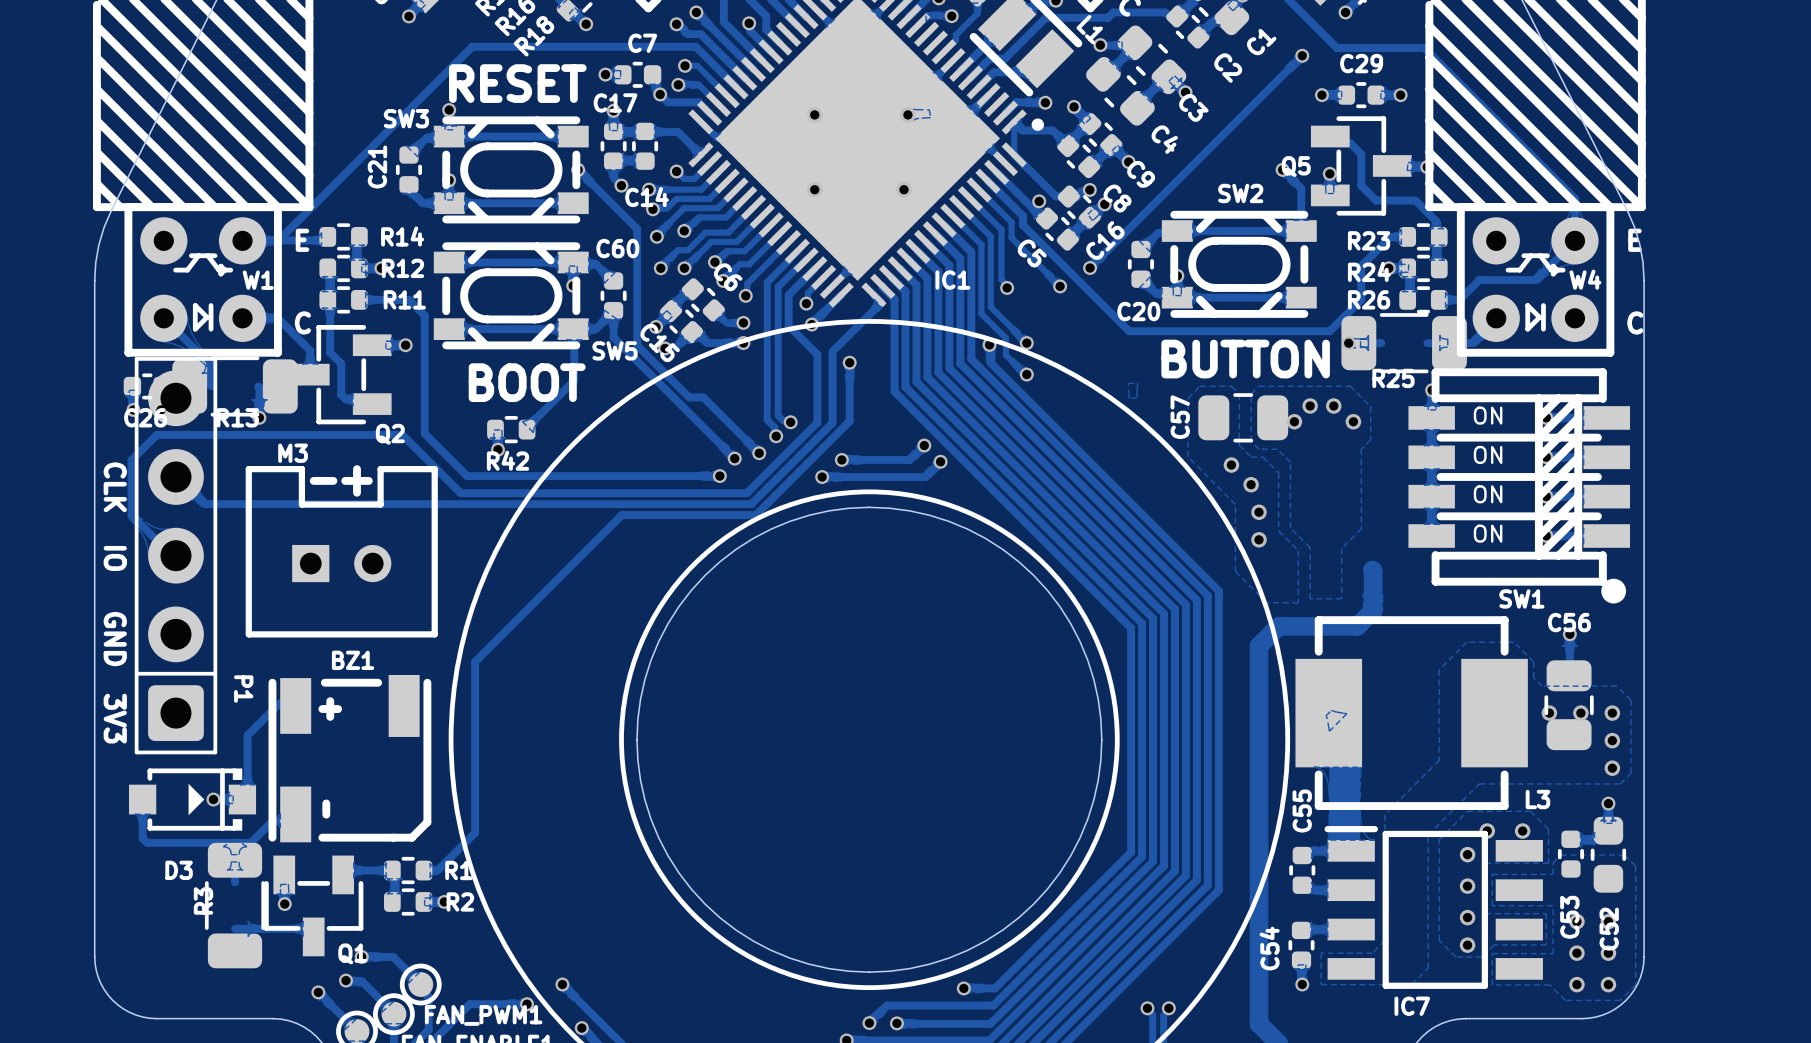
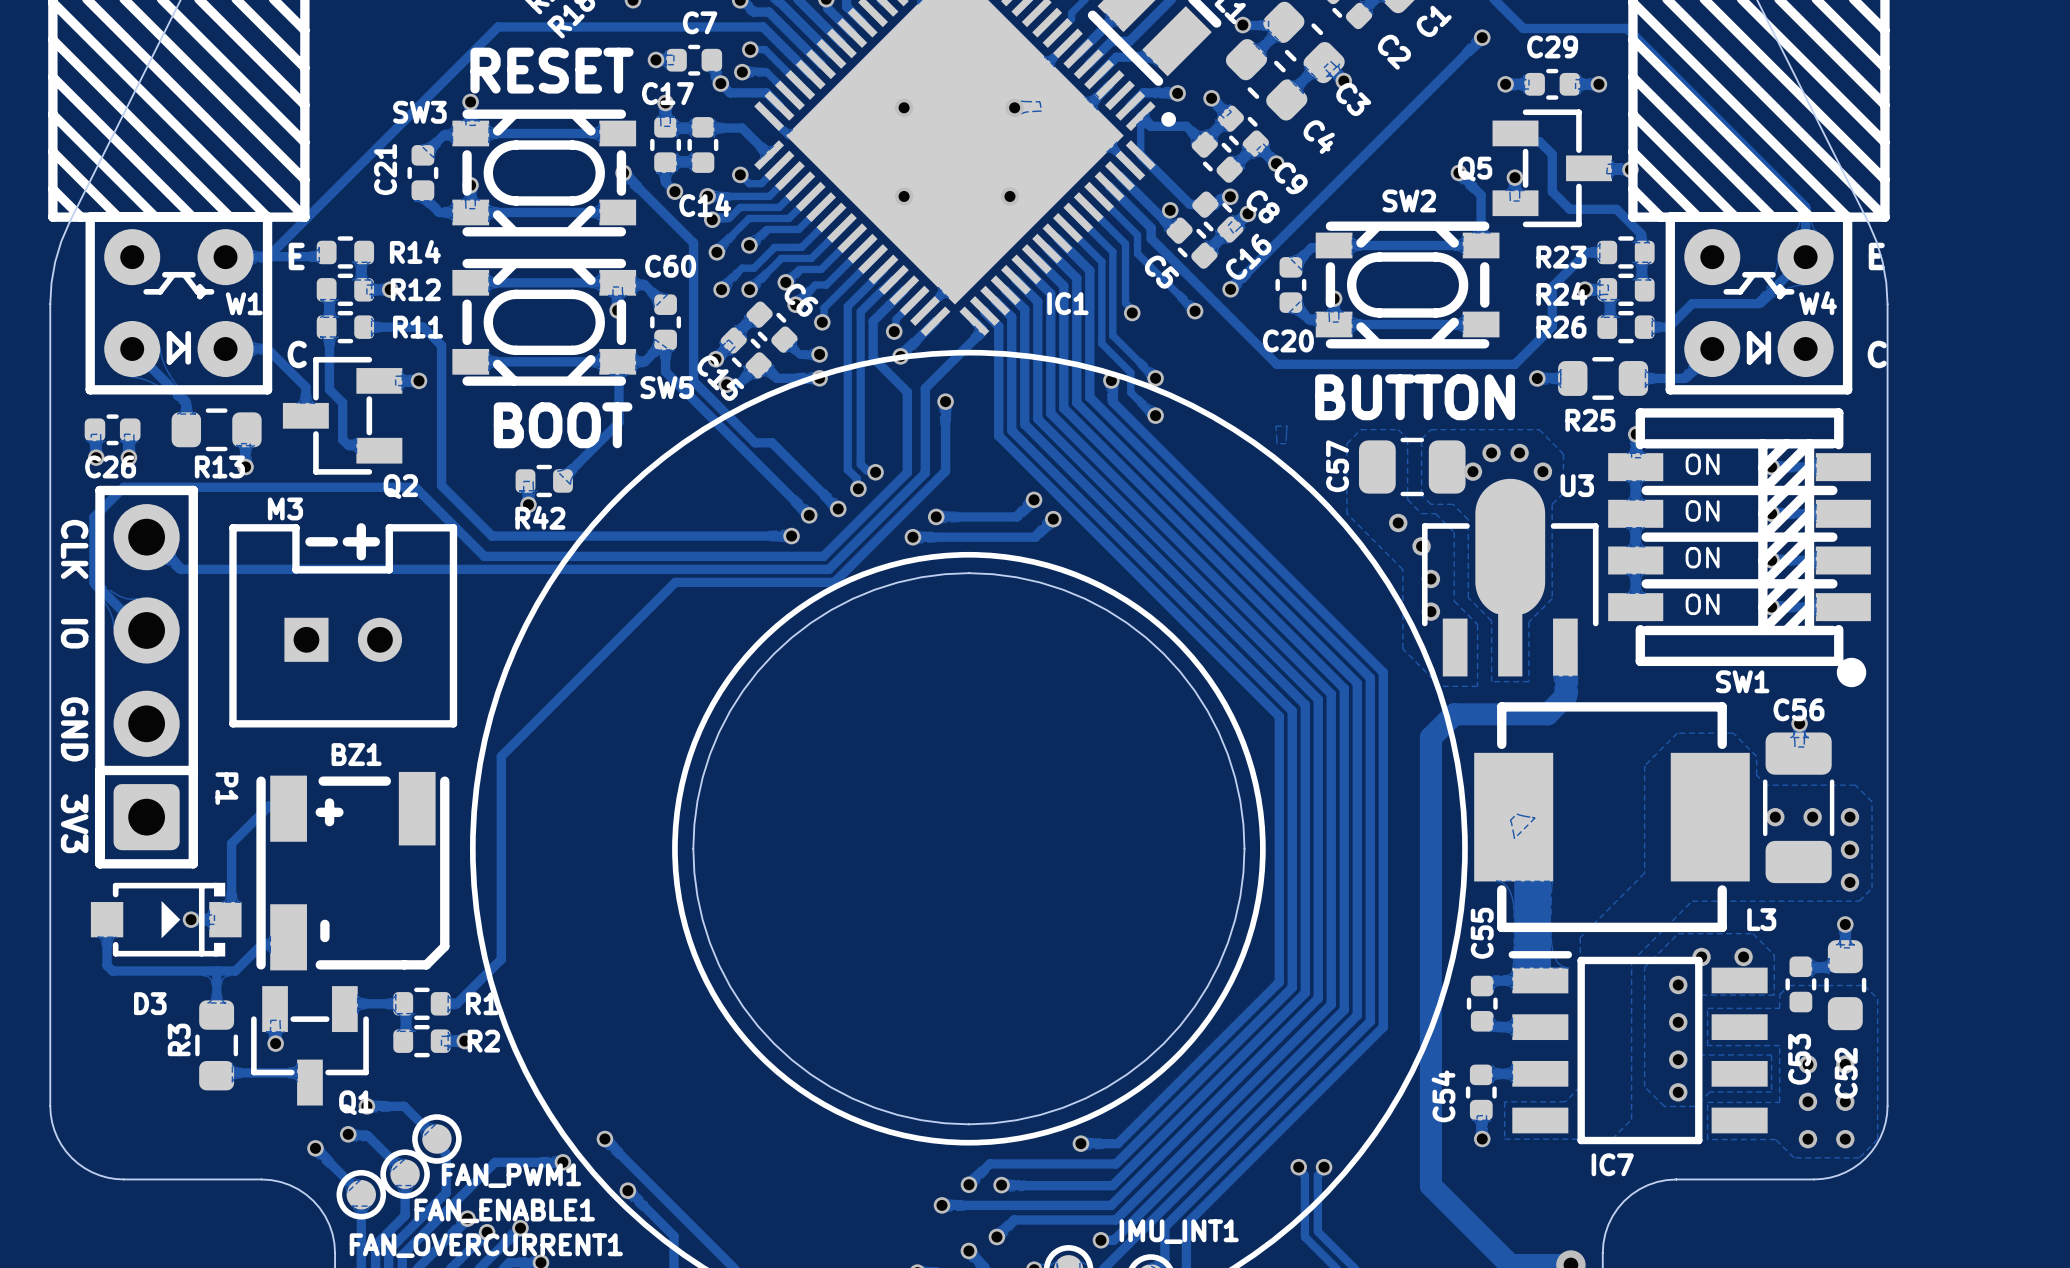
R25 footprint: [1341, 313, 1467, 374] -> [1558, 357, 1649, 400]
R13 footprint: [172, 356, 298, 417] -> [171, 408, 262, 452]
P1 footprint: [134, 357, 218, 755] -> [95, 485, 198, 869]
U3: none -> (1510, 577)
C56 footprint: [1544, 660, 1594, 751] -> [1763, 732, 1835, 884]
R3 footprint: [204, 842, 266, 969] -> [195, 1000, 239, 1091]

